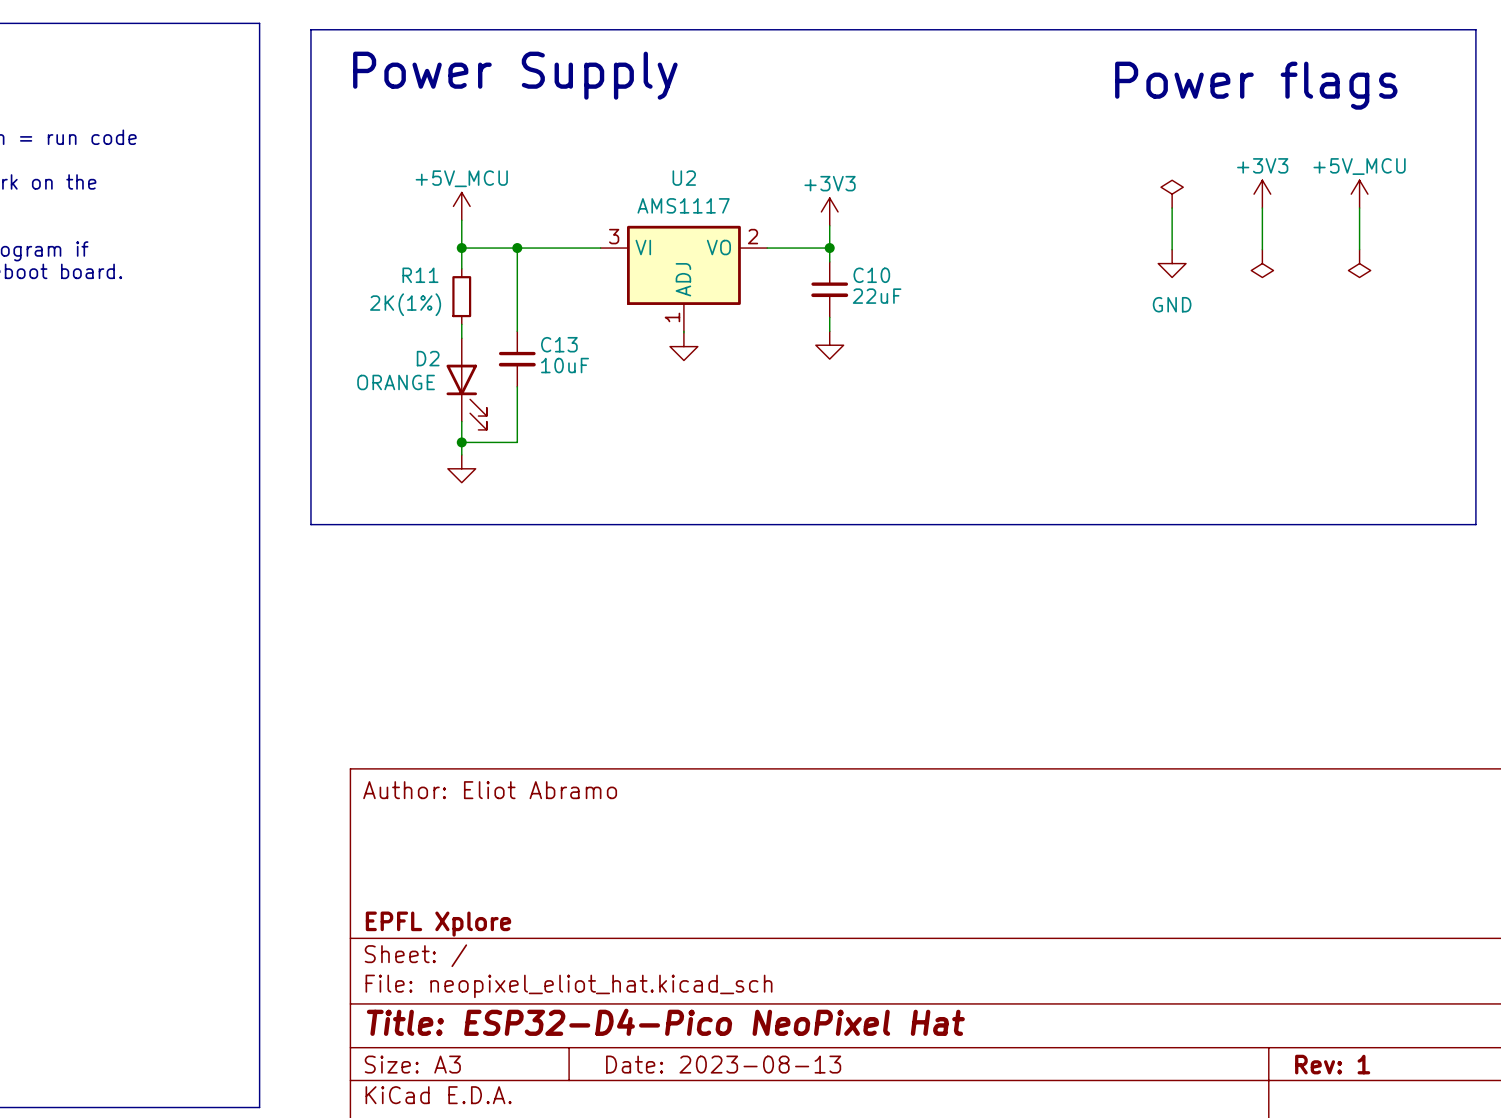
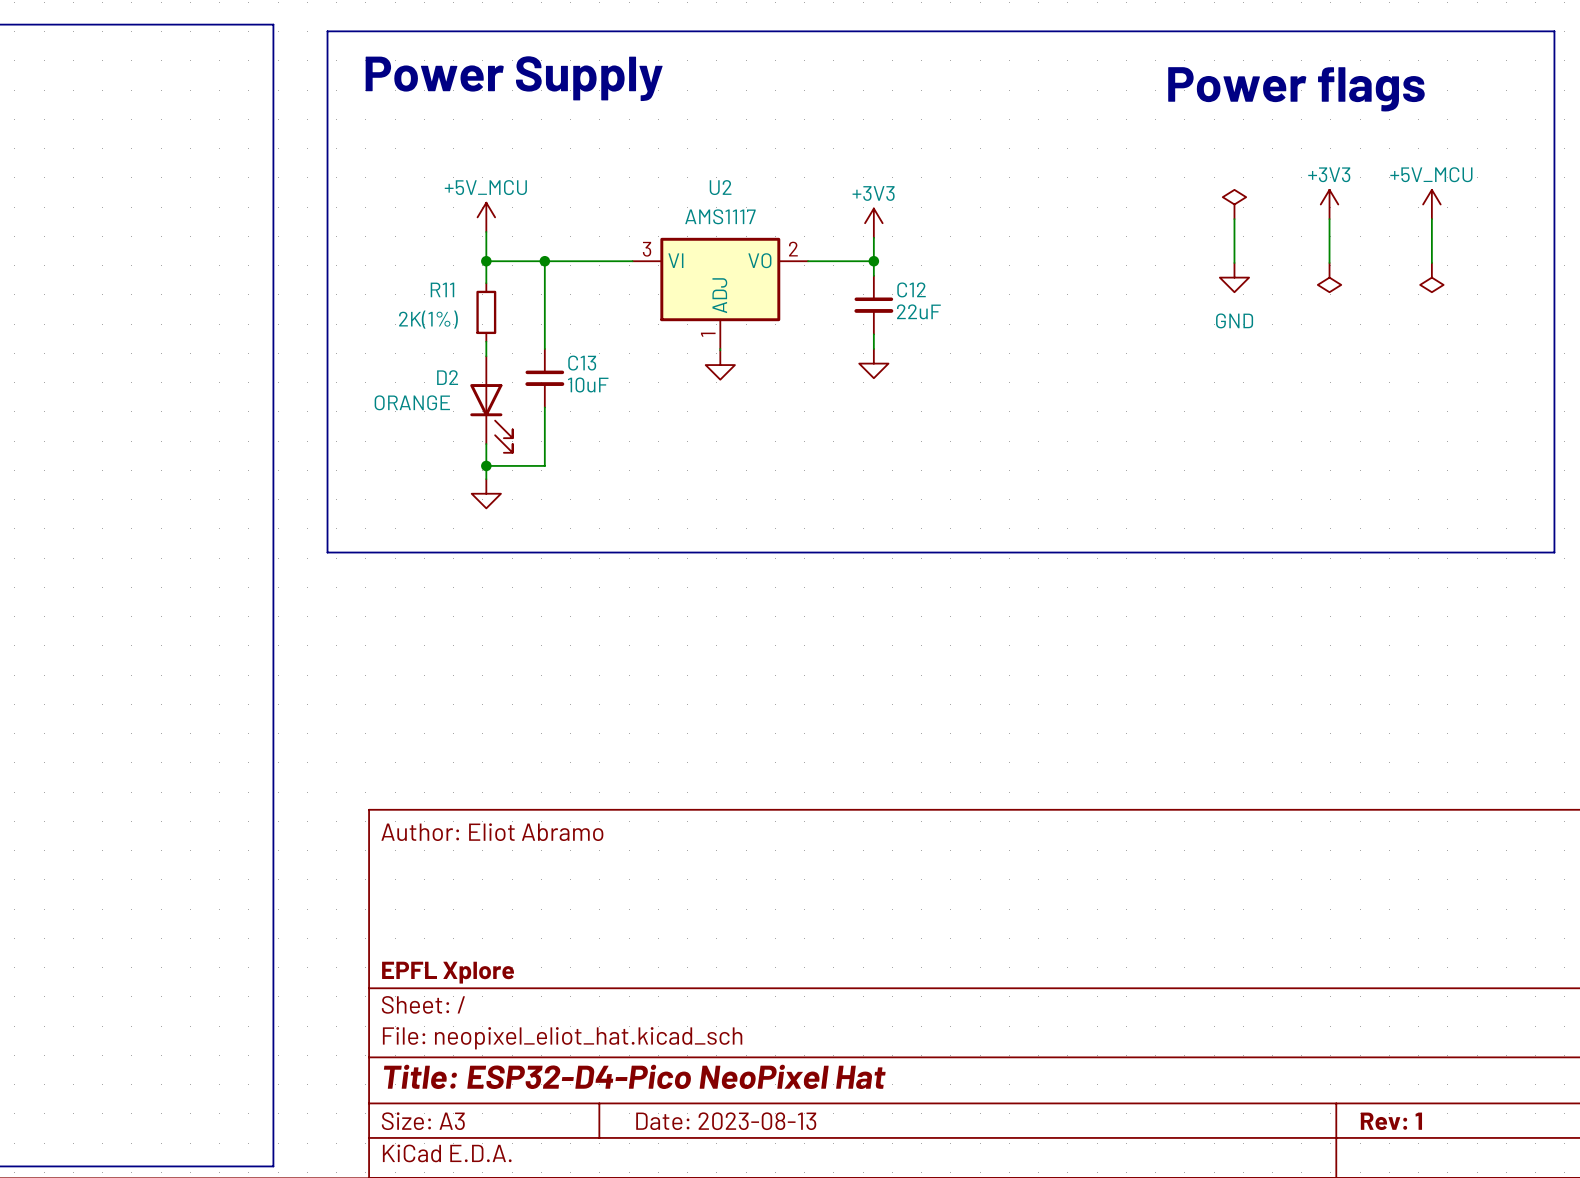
C10 name: C10 (871, 275) -> C12 (911, 289)

